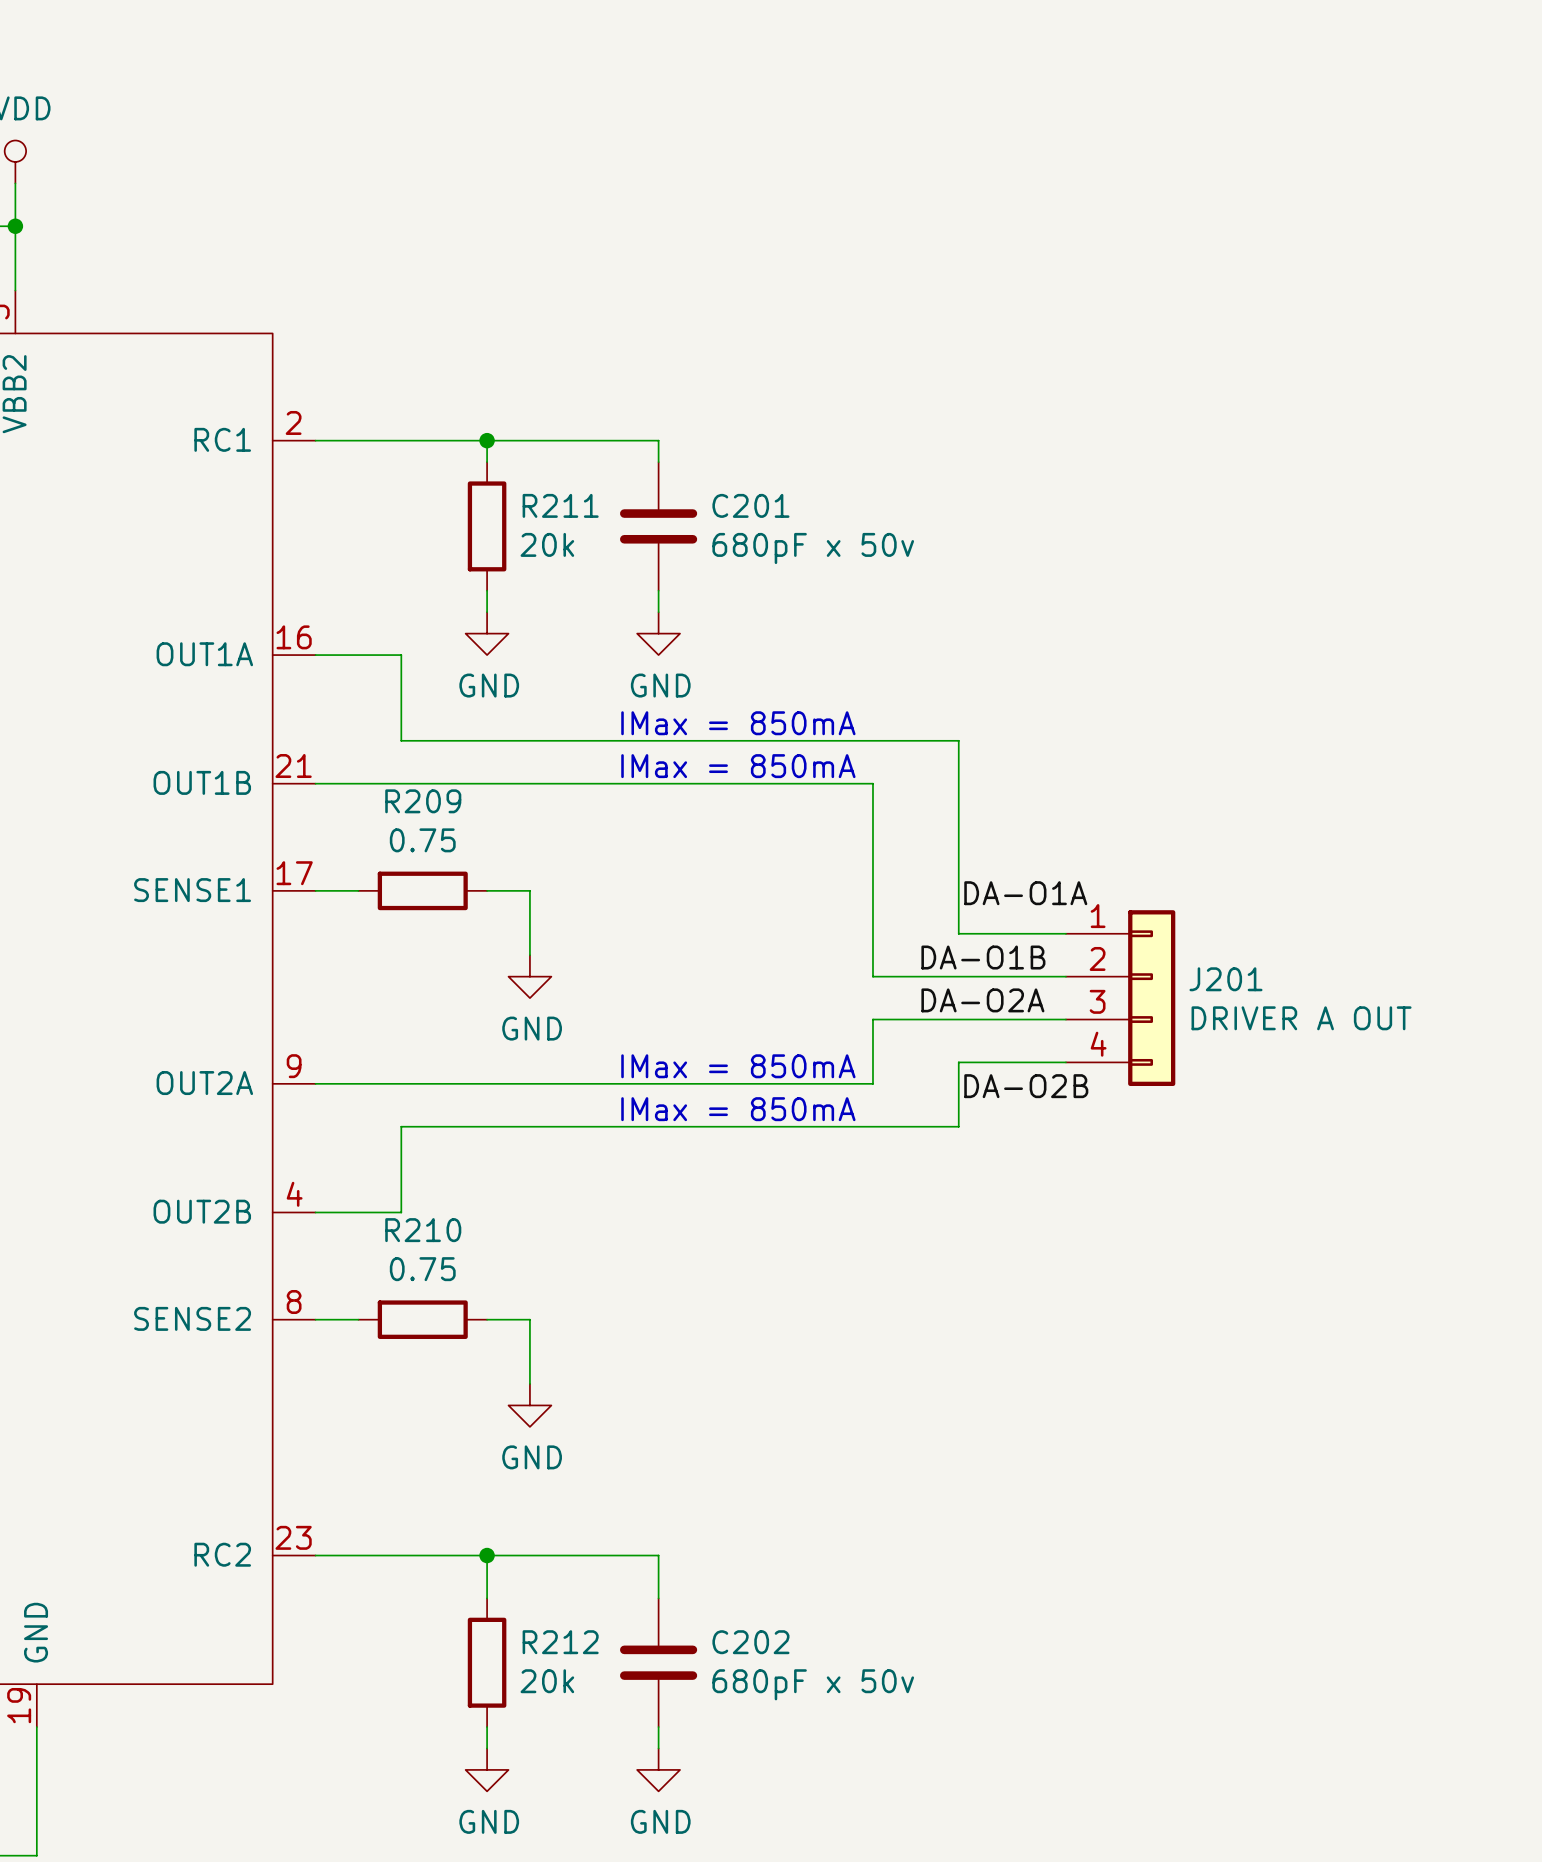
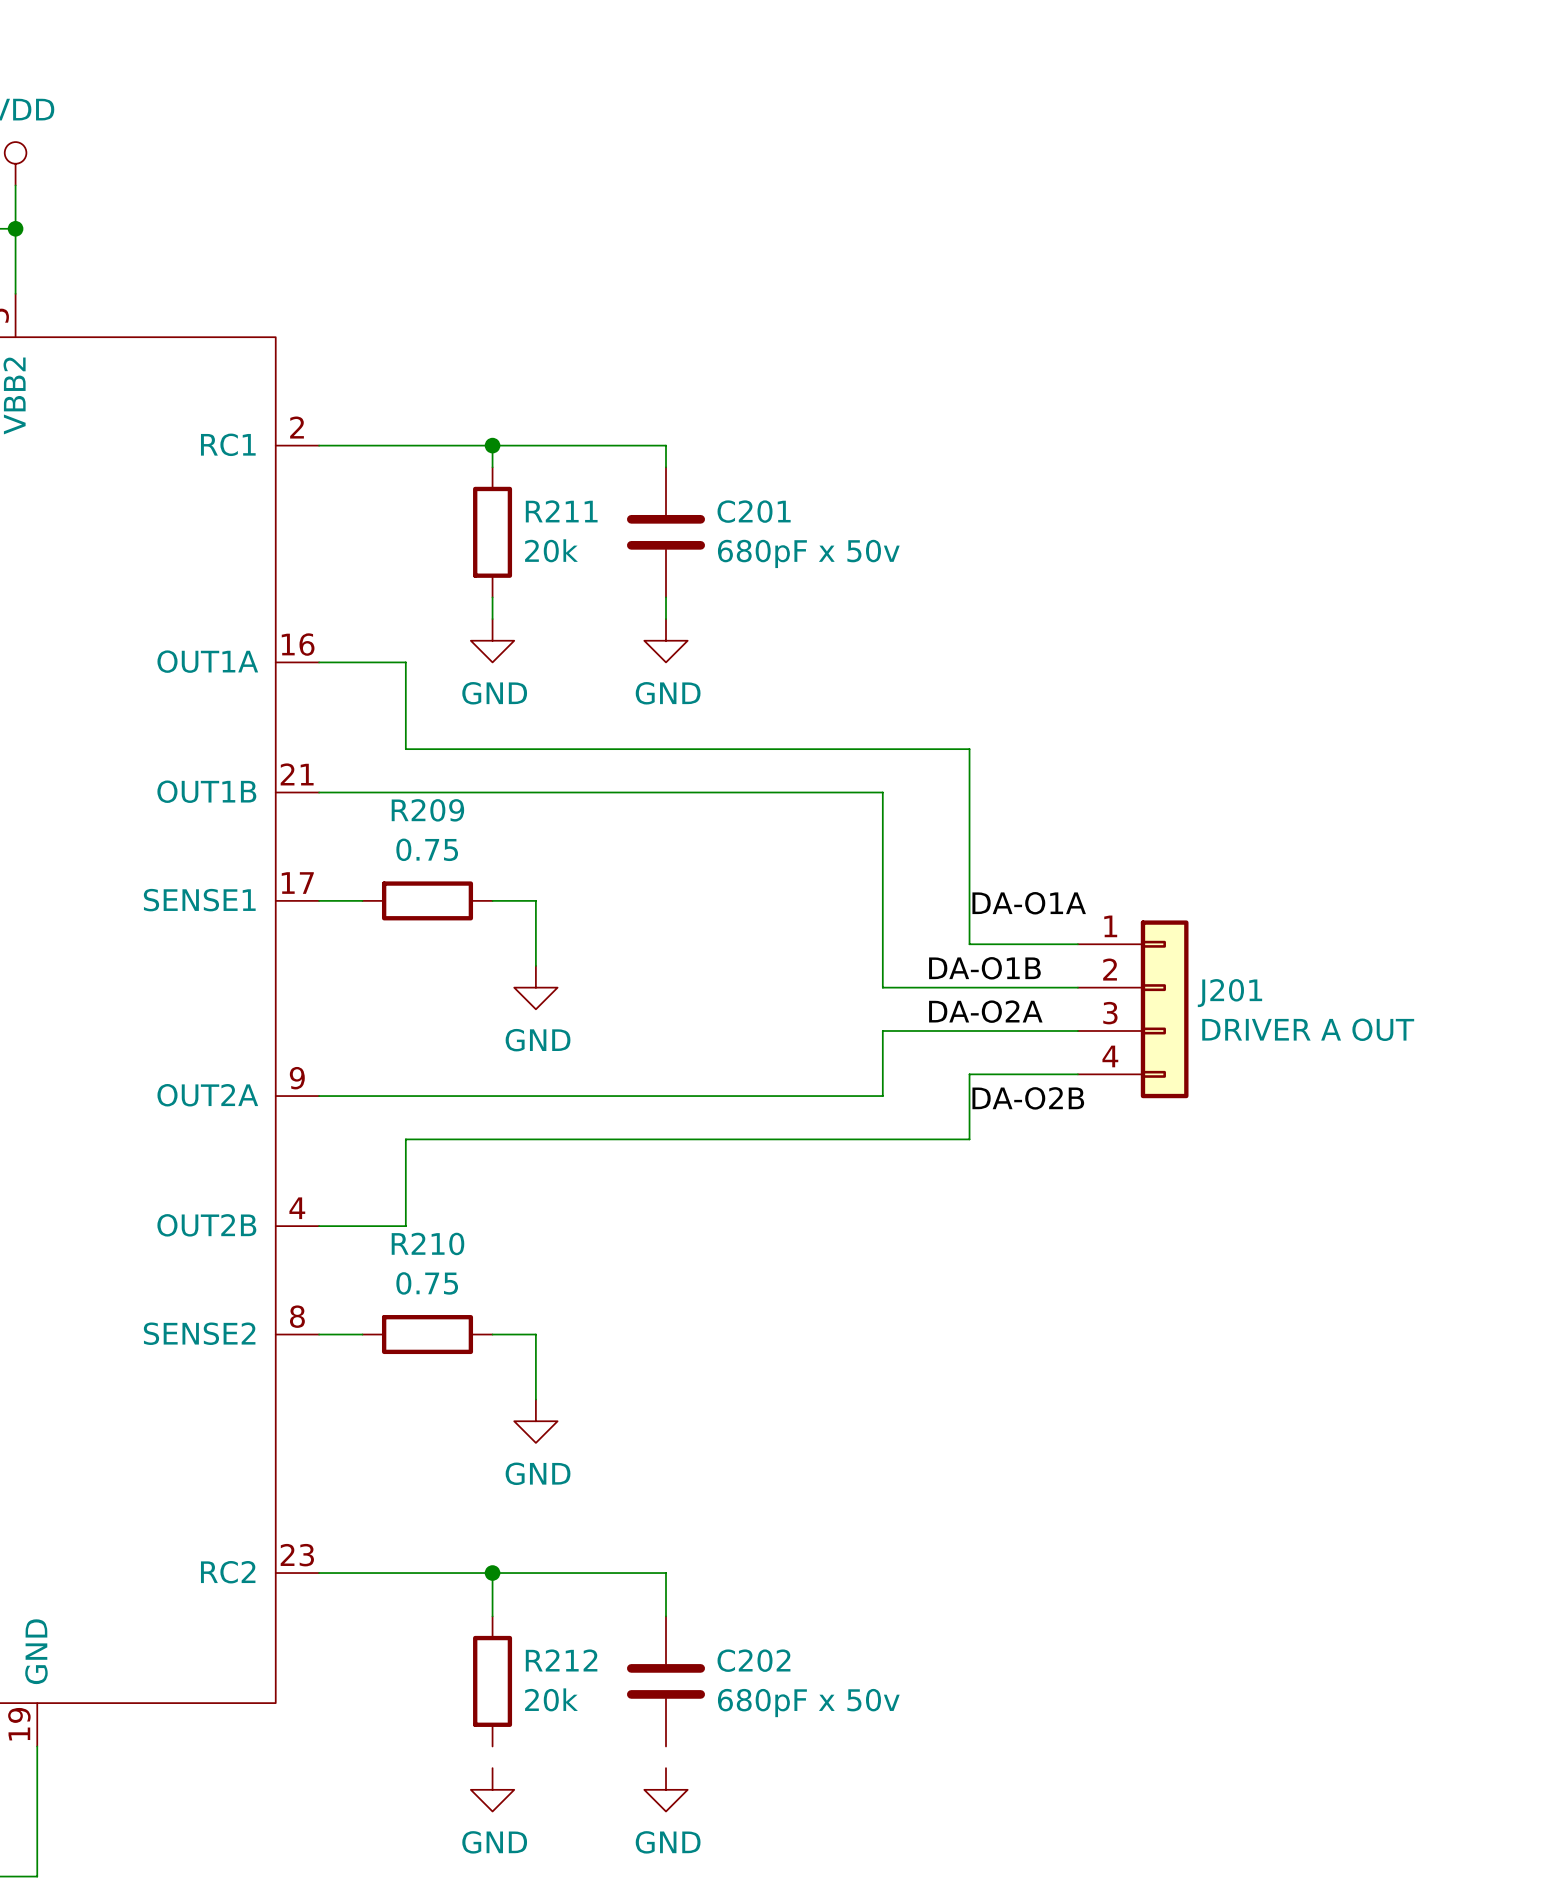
text: IMax = 850mA (738, 723) -> none
text: IMax = 850mA (738, 766) -> none
text: IMax = 850mA (738, 1066) -> none
text: IMax = 850mA (738, 1109) -> none
wire: (487, 1727) (487, 1748) -> none
wire: (658, 1727) (658, 1748) -> none

